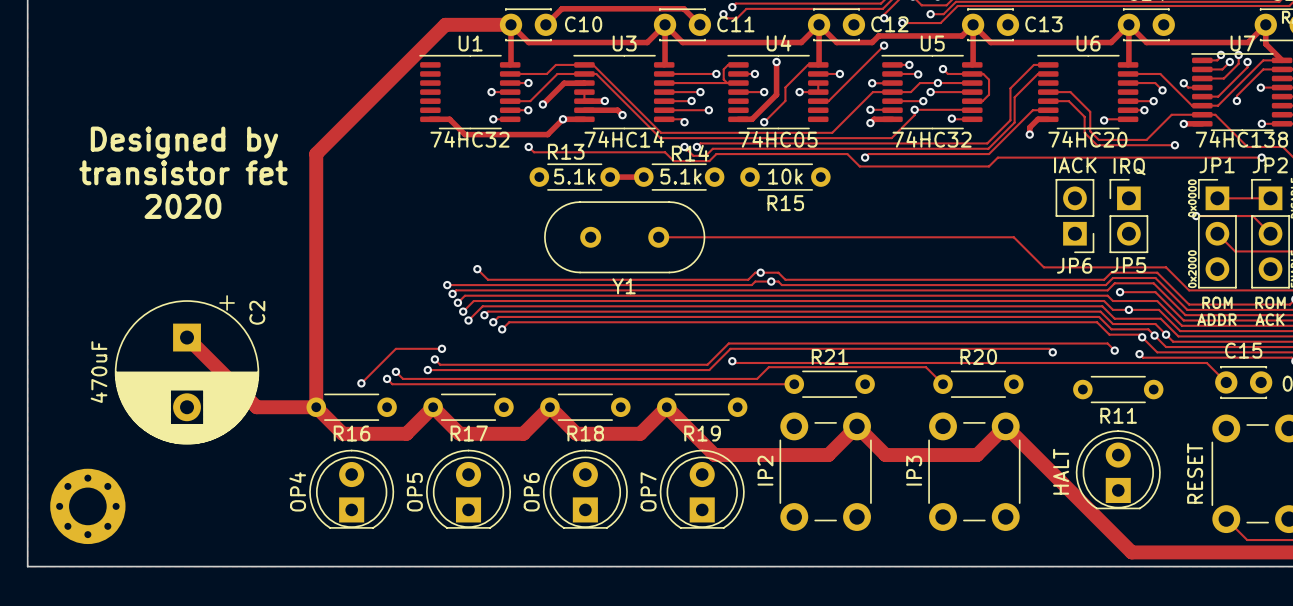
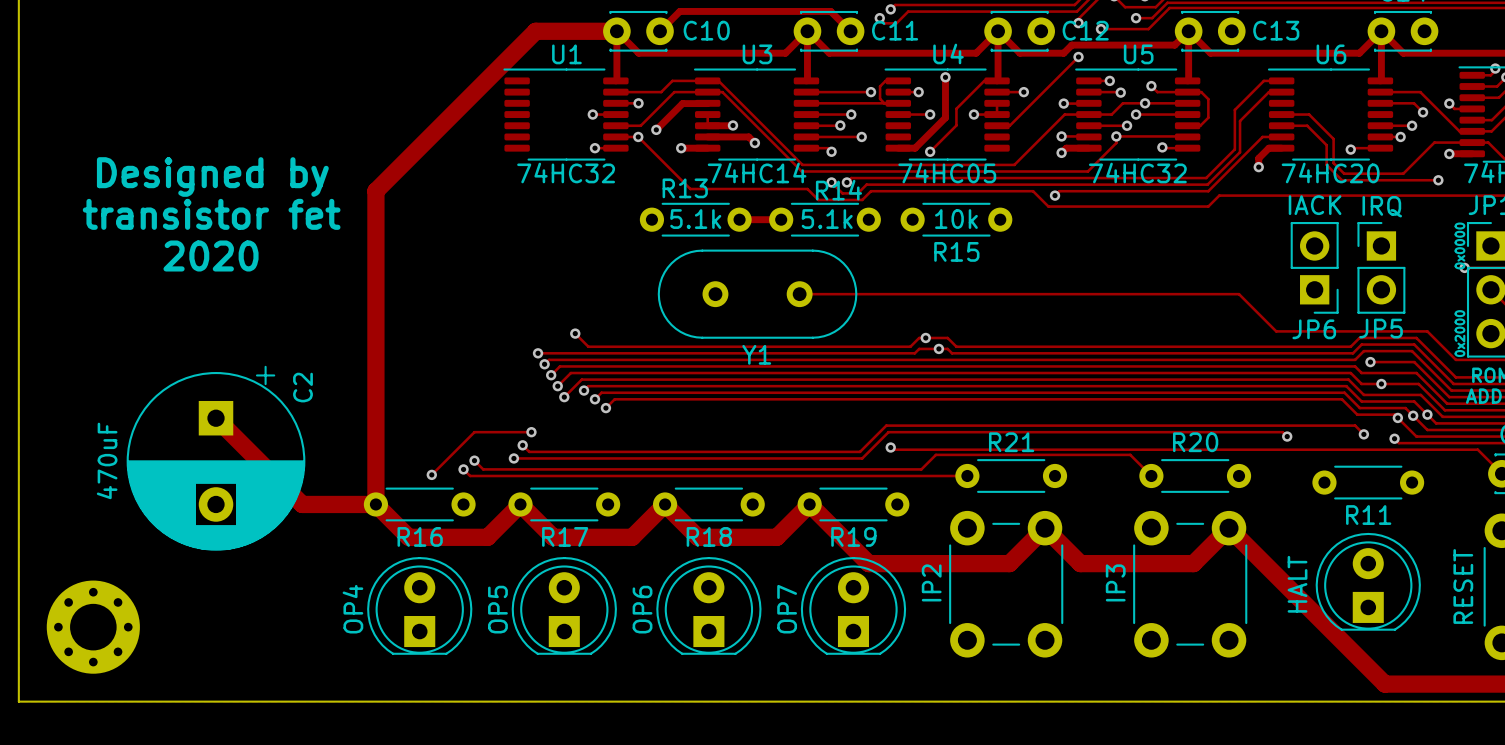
track: (430, 119) (449, 119) (464, 134) (547, 134) (562, 119) -> none
track: (528, 146) (534, 152) (570, 152) -> (638, 137) (690, 189)
via: (528, 146) -> none

